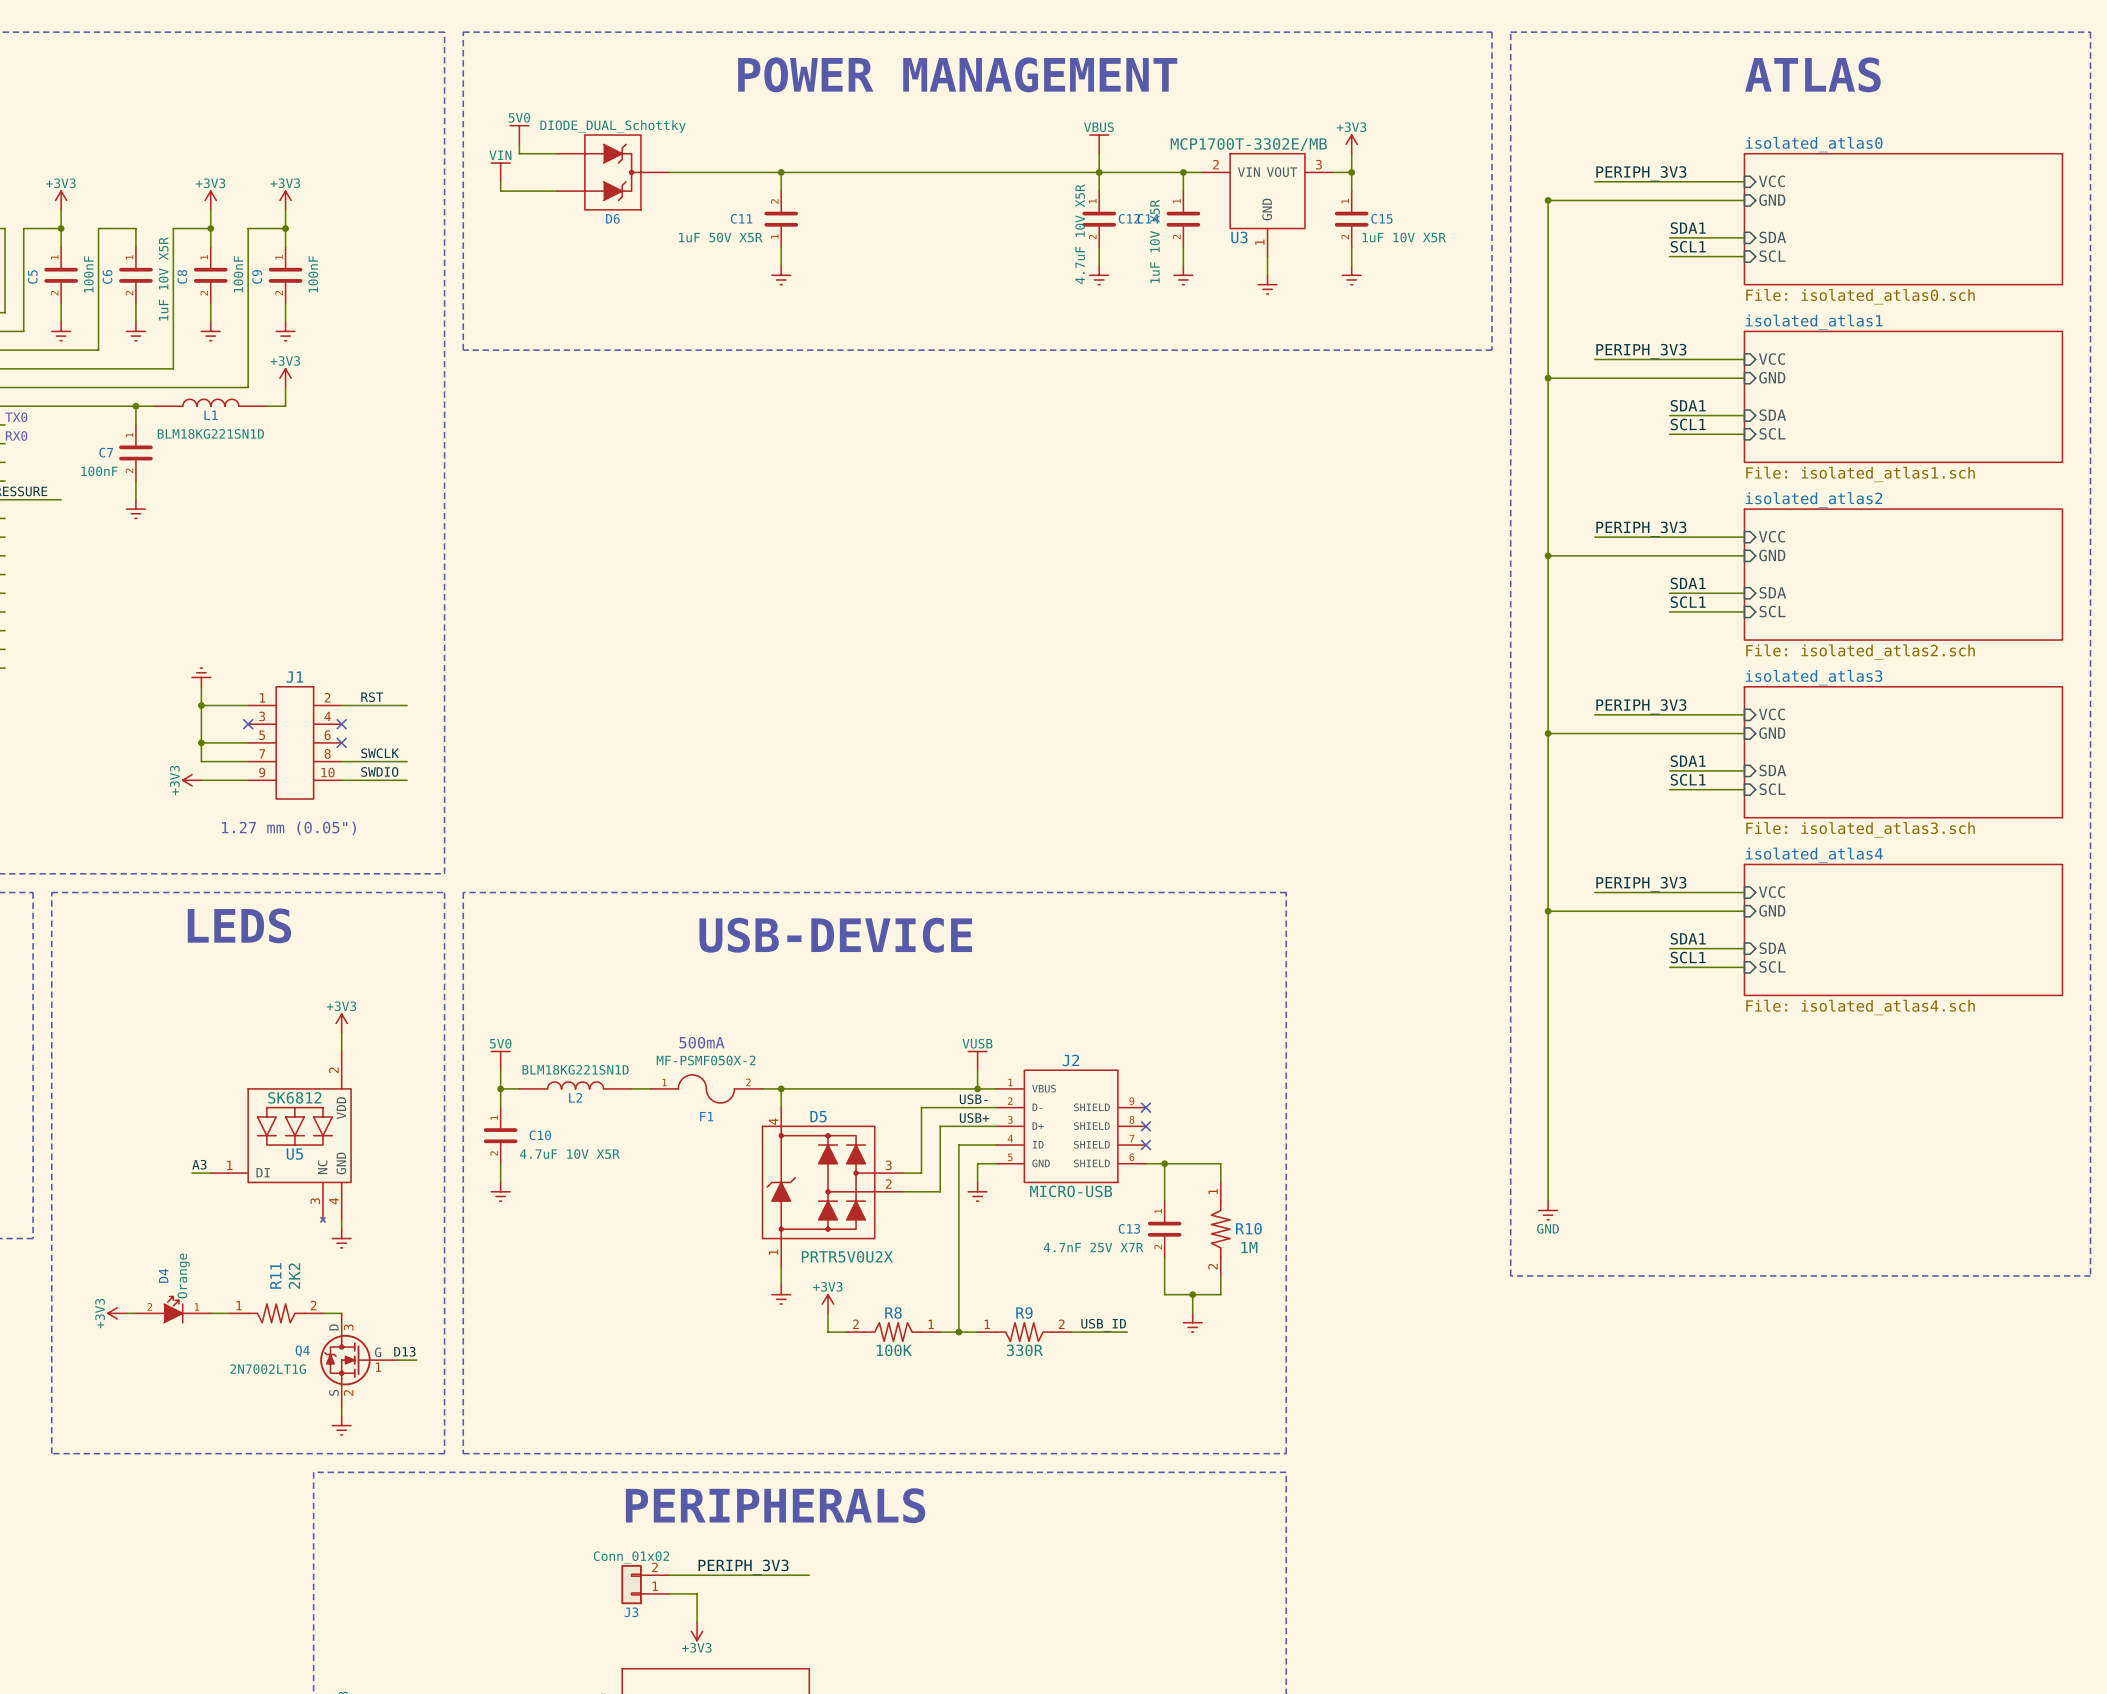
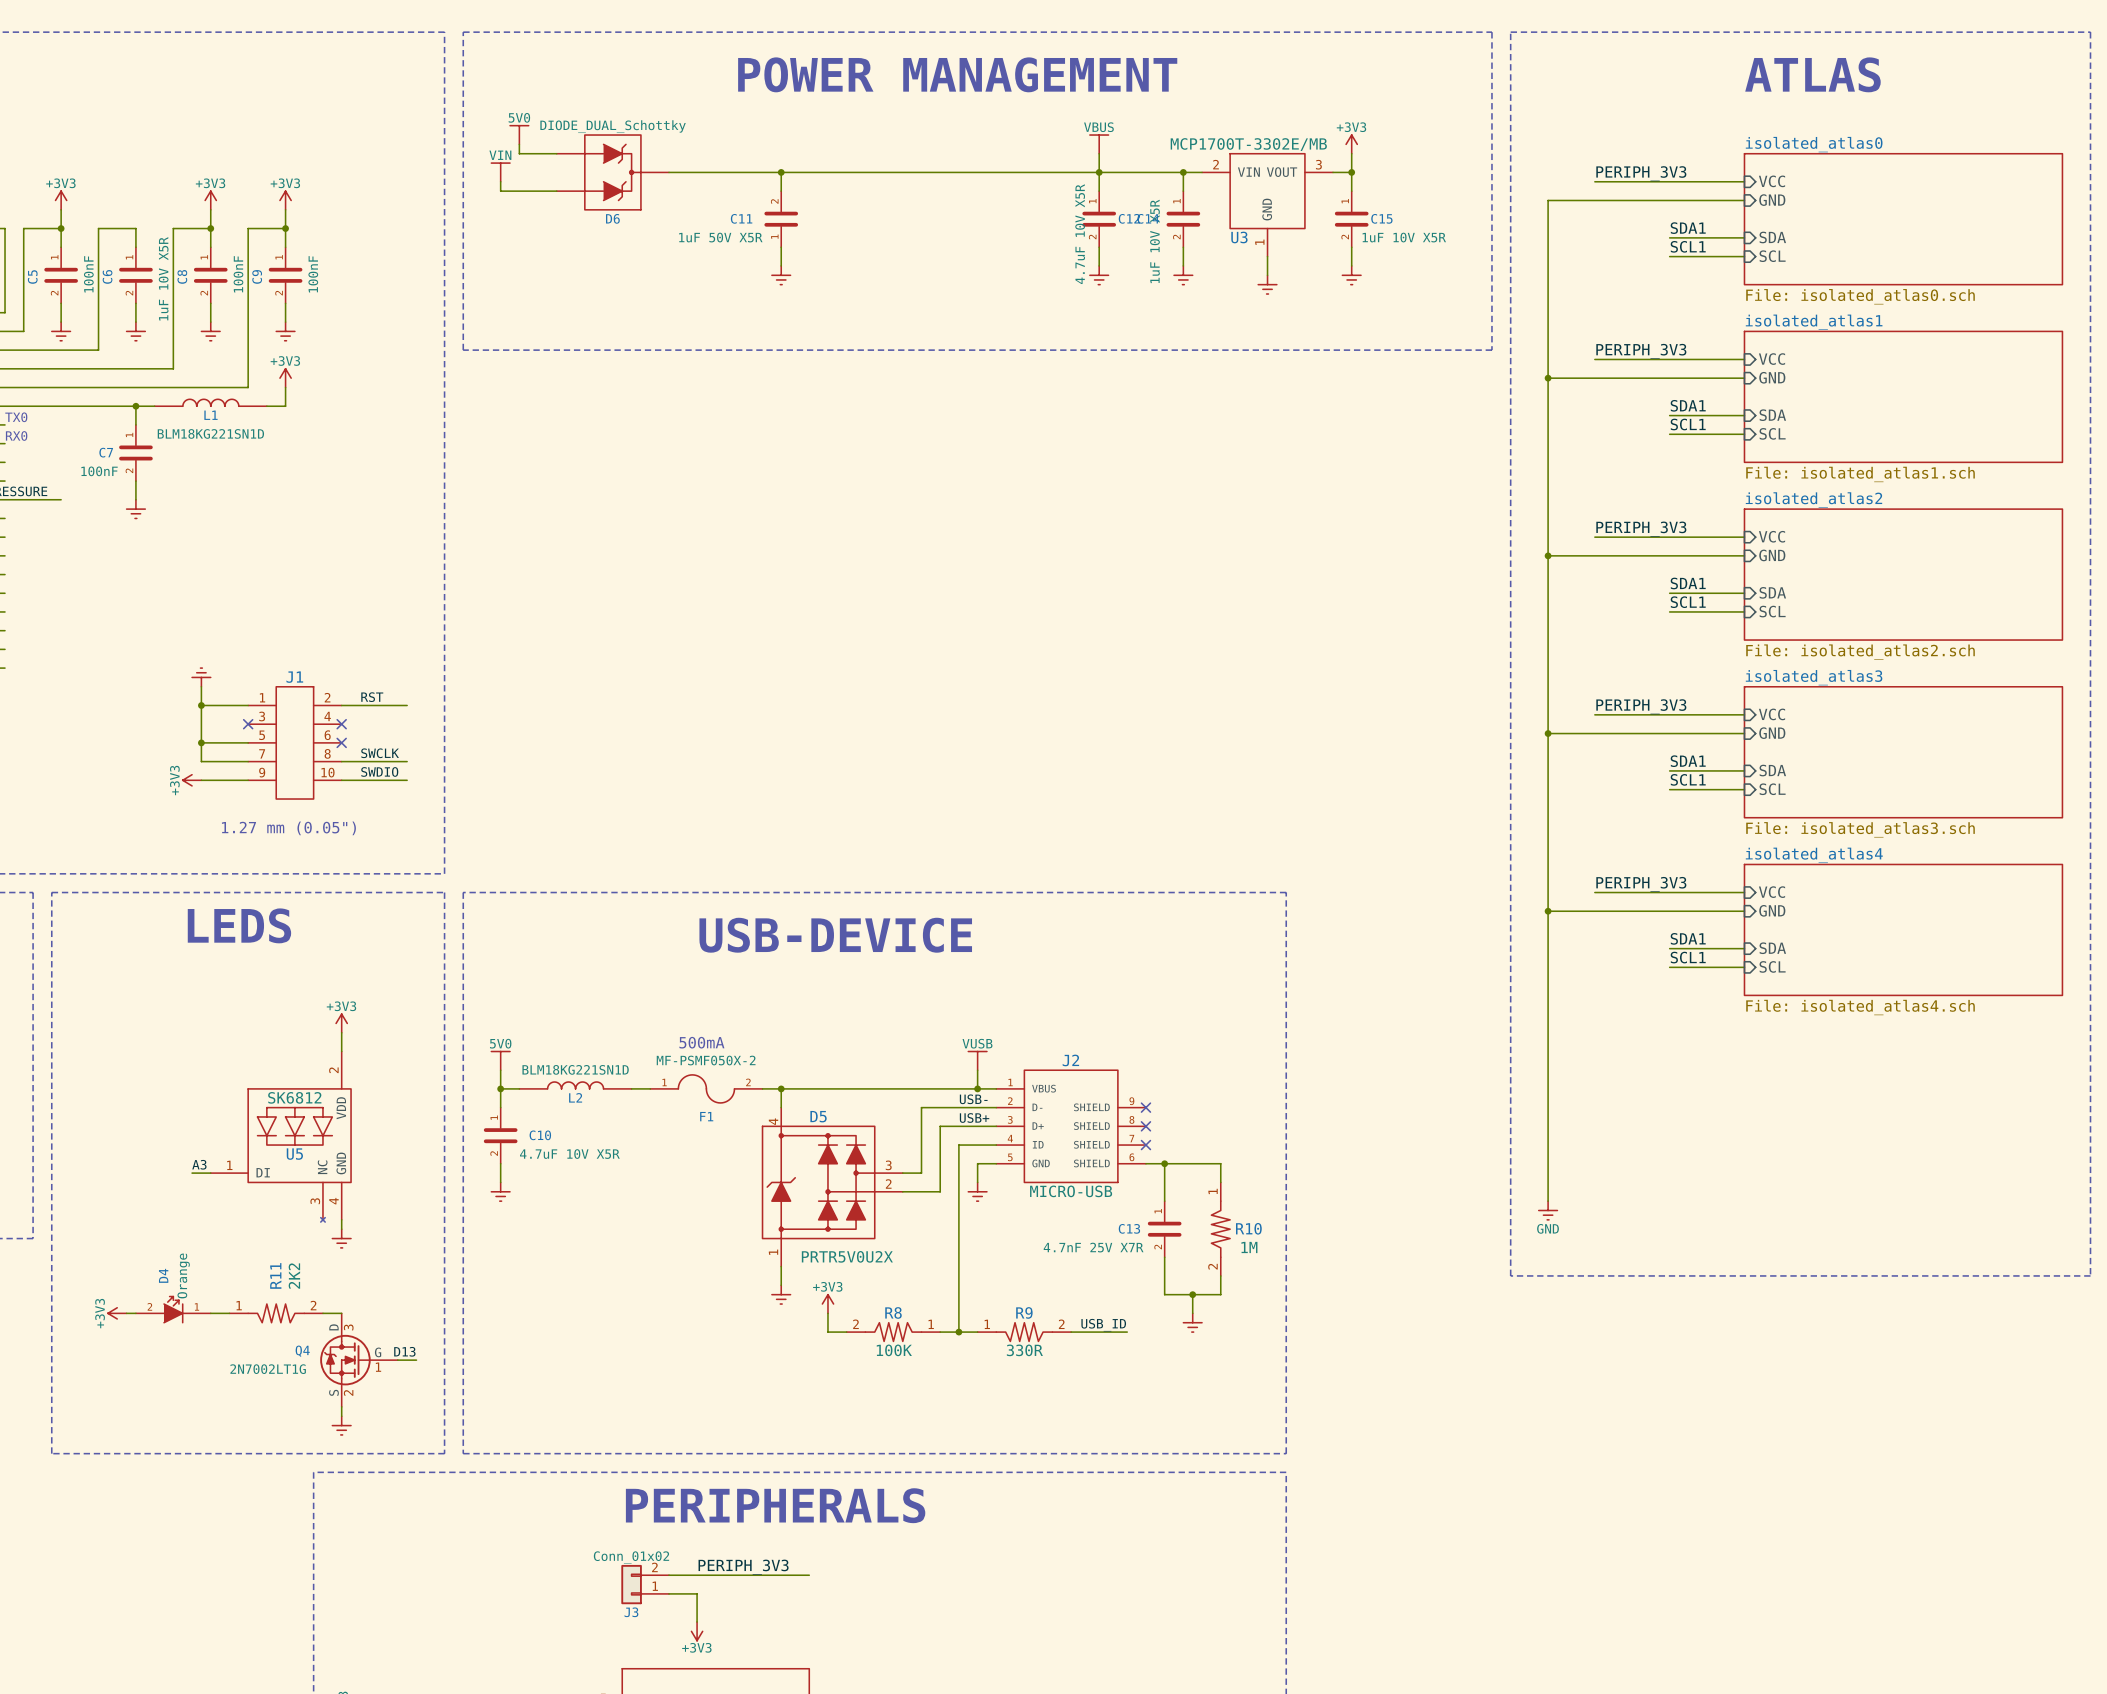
junction: (1548, 200) -> none

